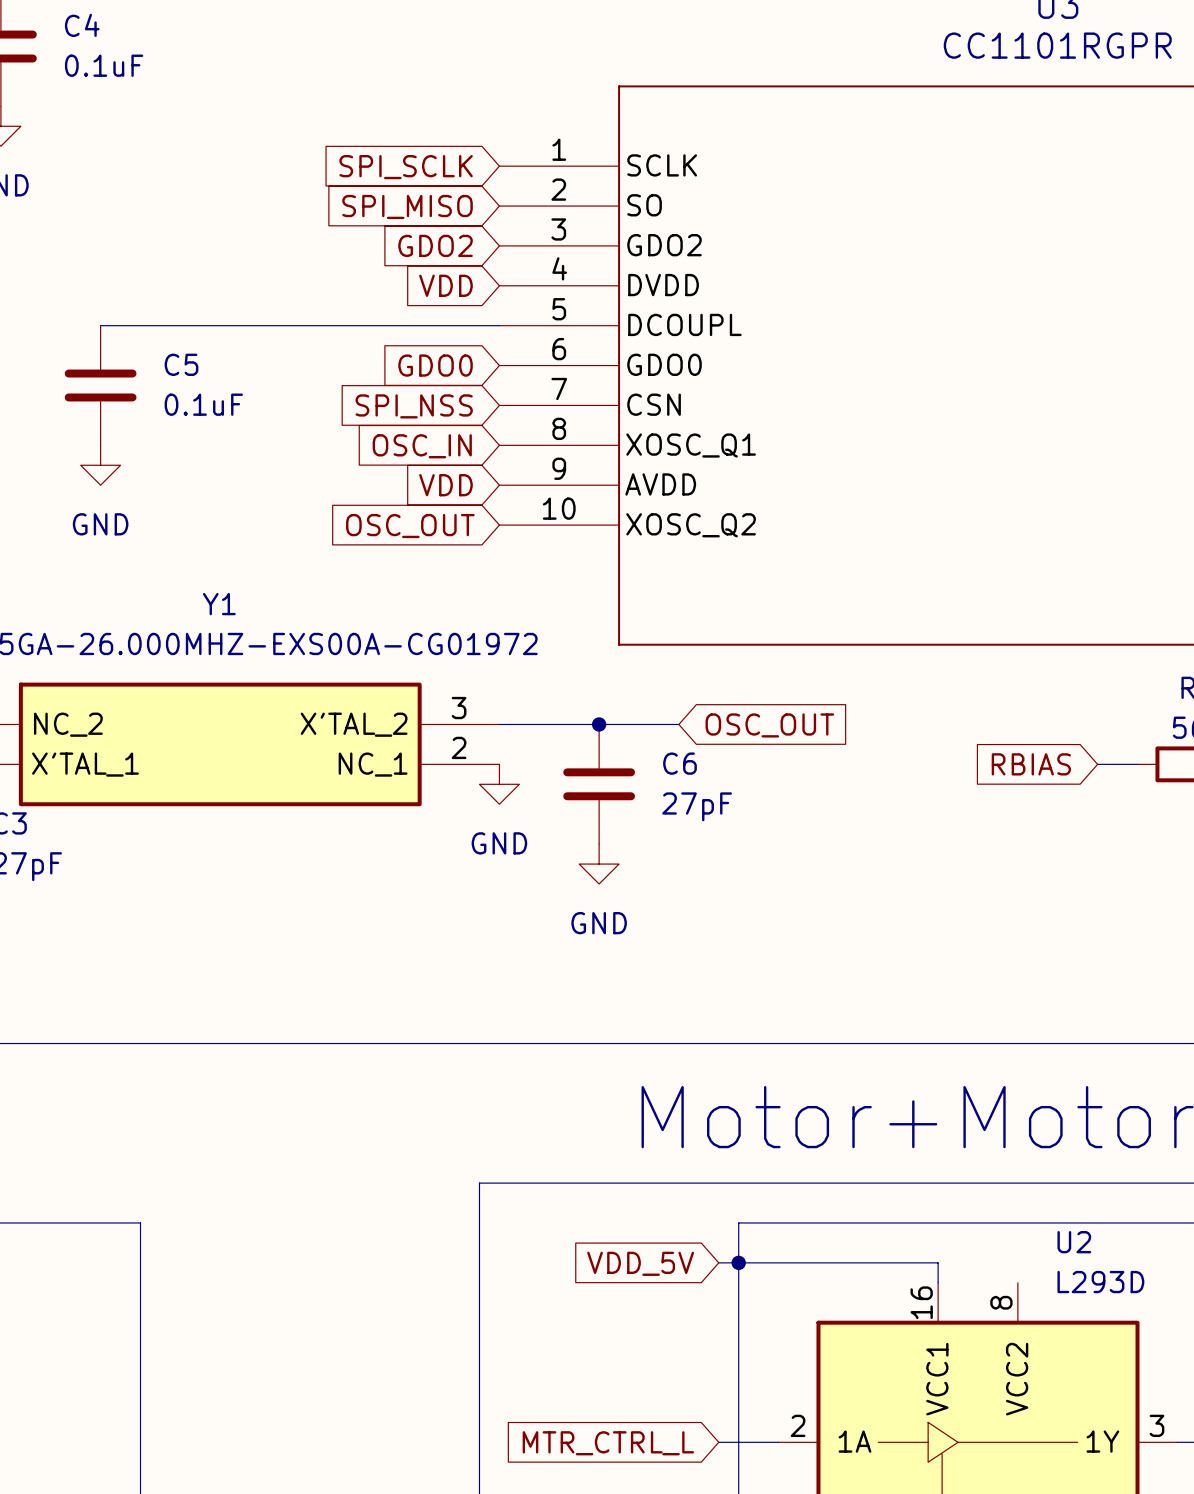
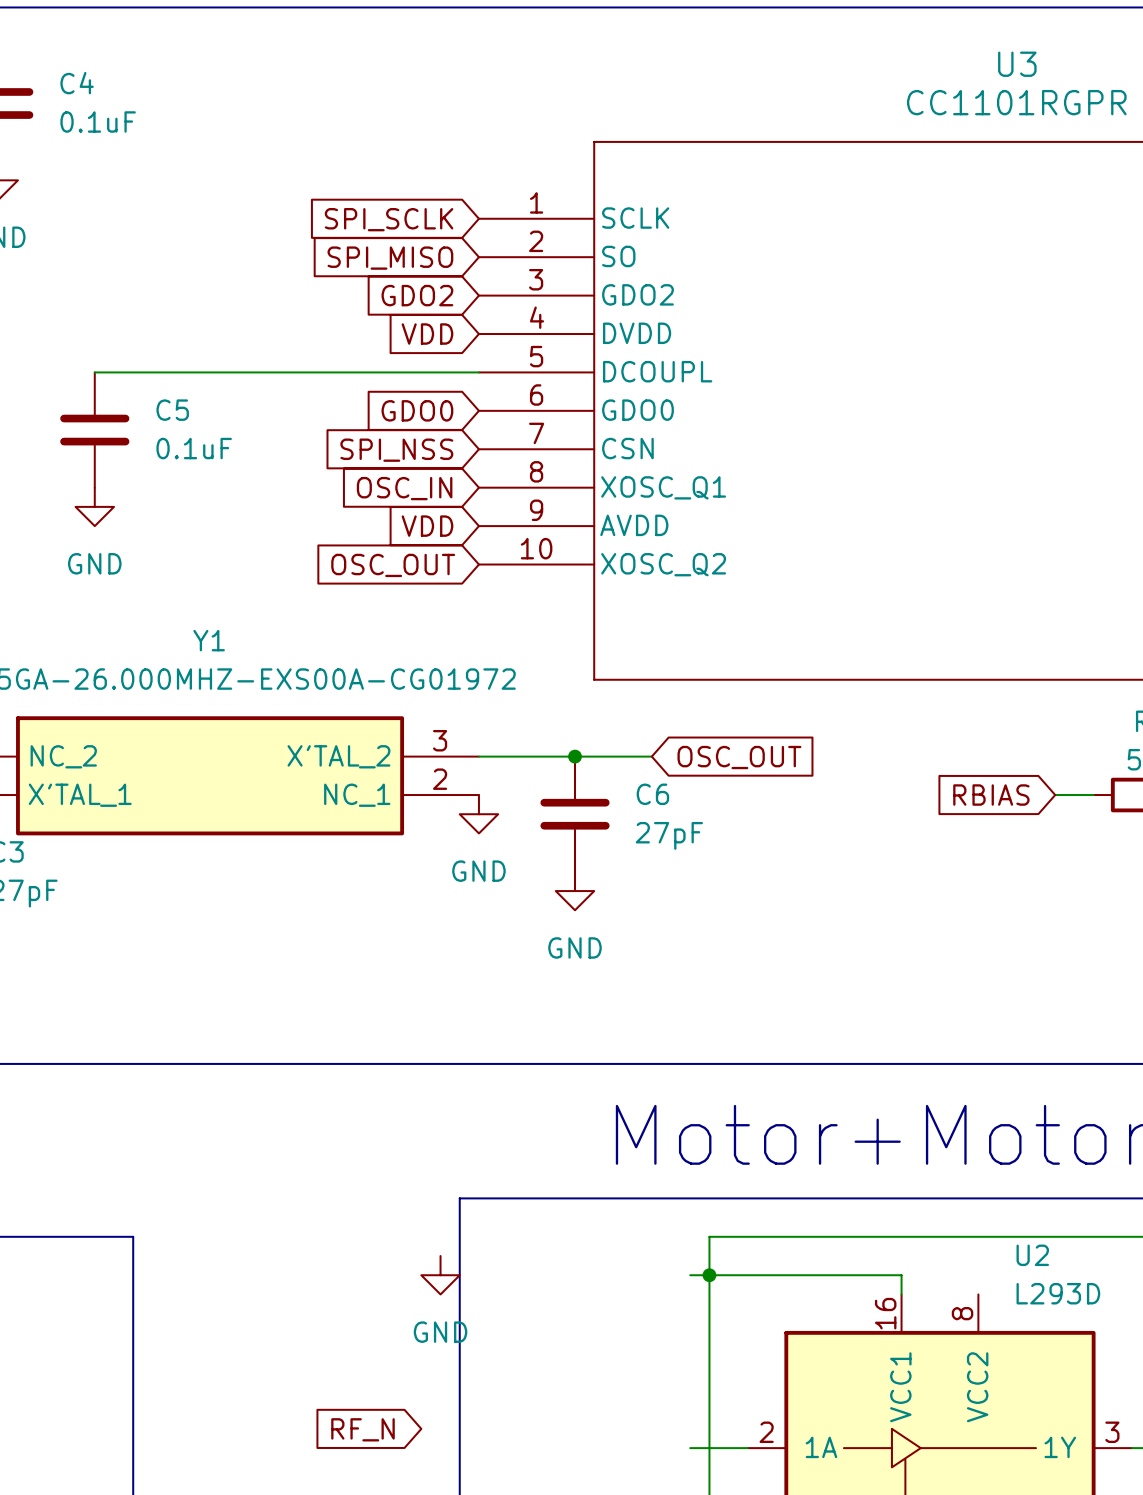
power symbol: none -> GND (440, 1275)
global label: VDD_5V (640, 1263) -> none
global label: none -> RF_N (362, 1429)
global label: MTR_CTRL_L (608, 1443) -> none

